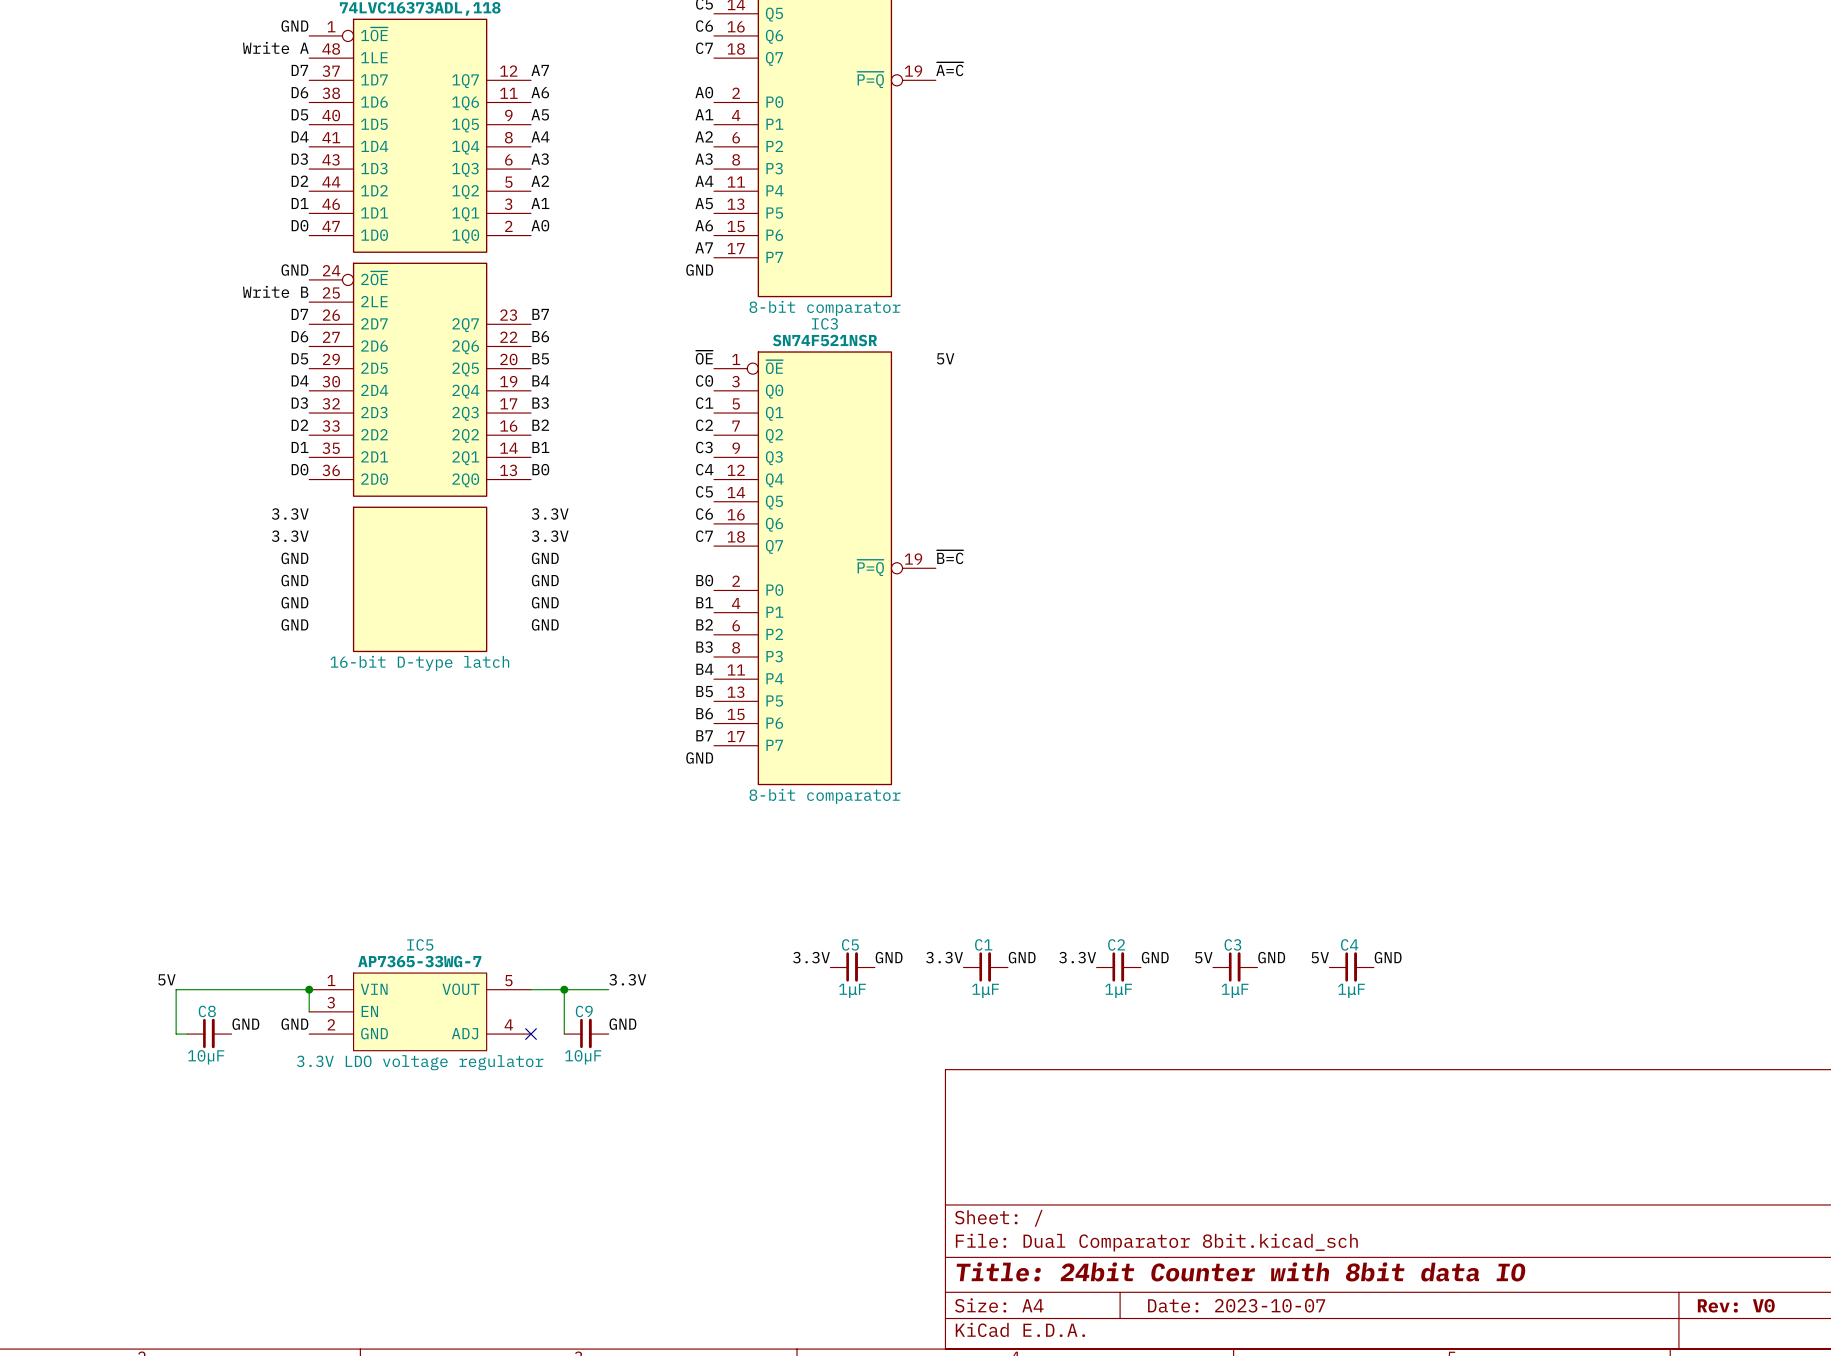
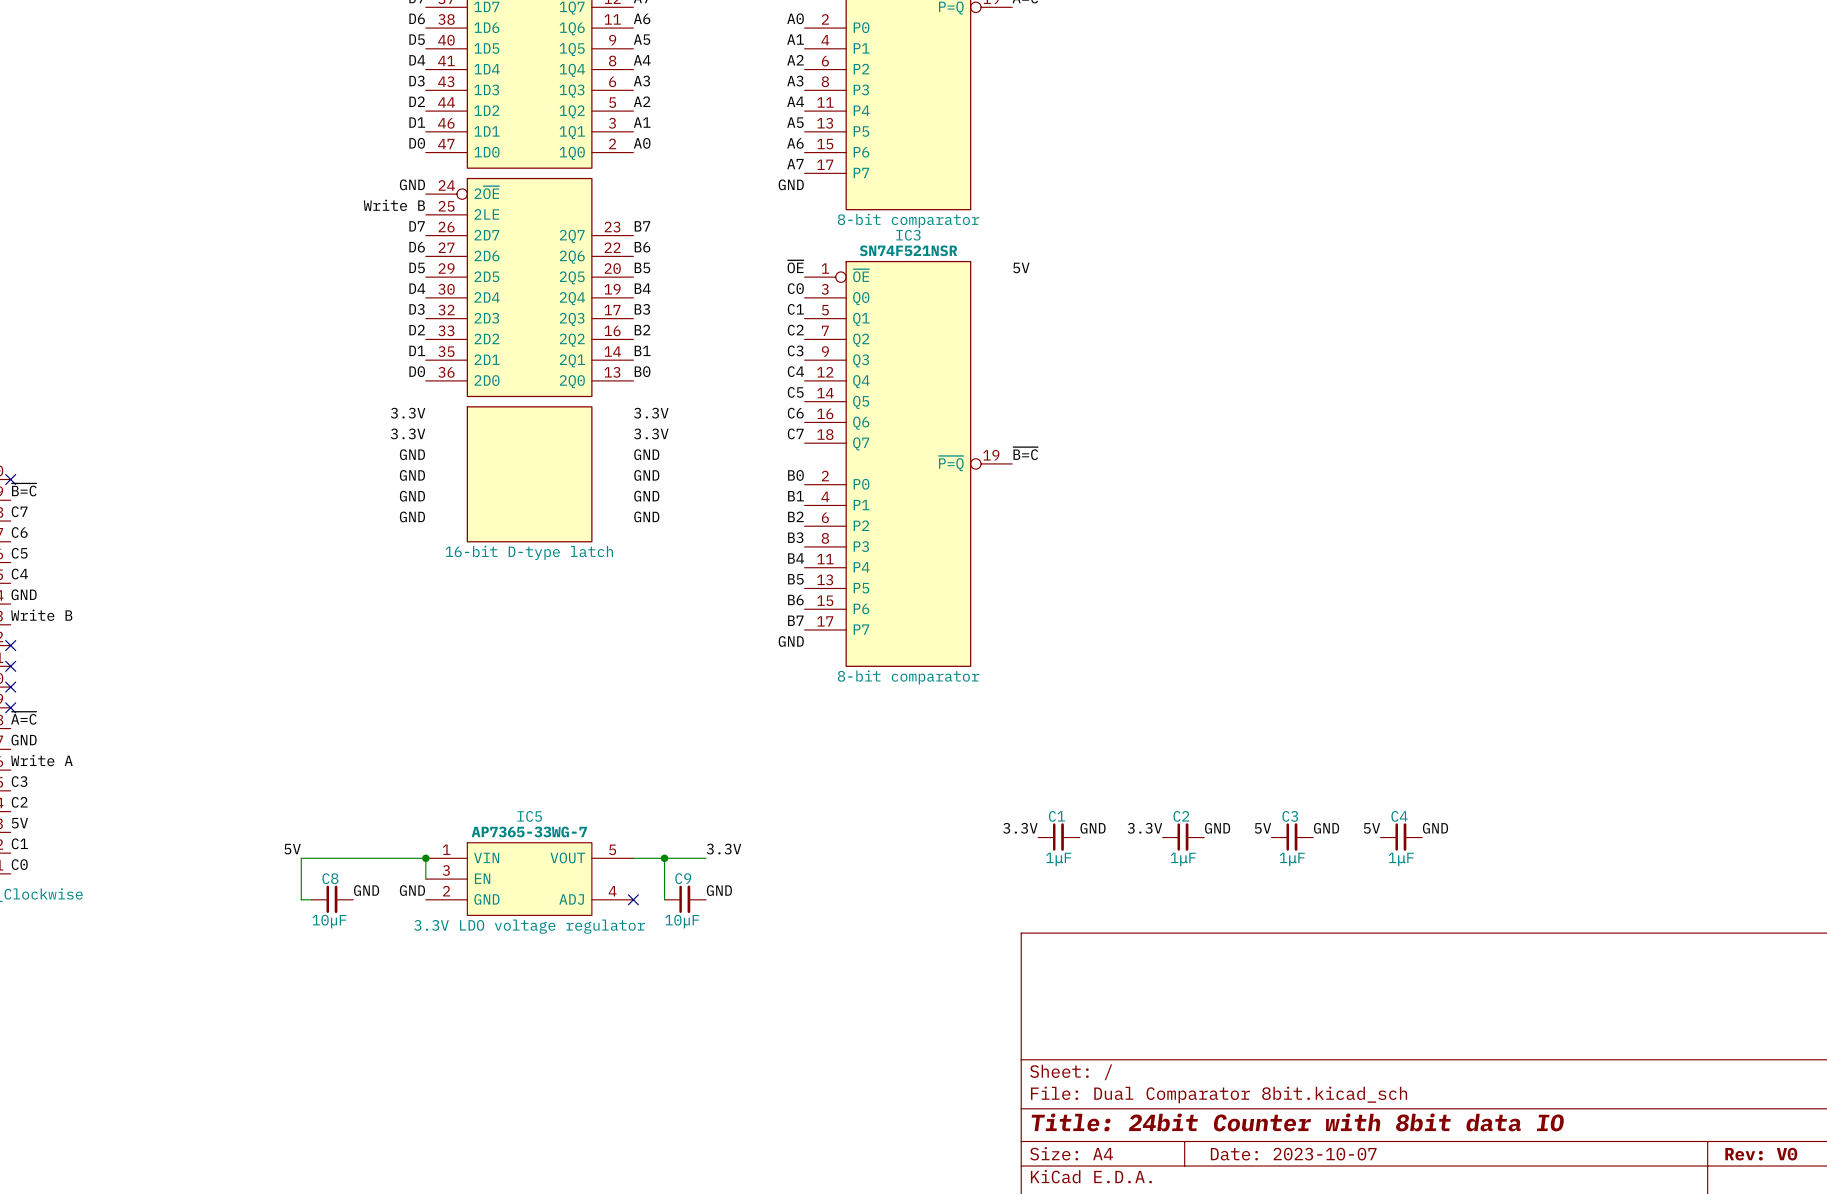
label: 3.3V (811, 957) -> none
label: GND (889, 957) -> none
C5: 1μF (852, 966) -> none

